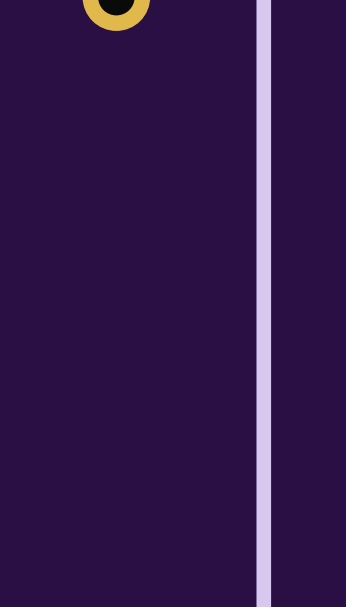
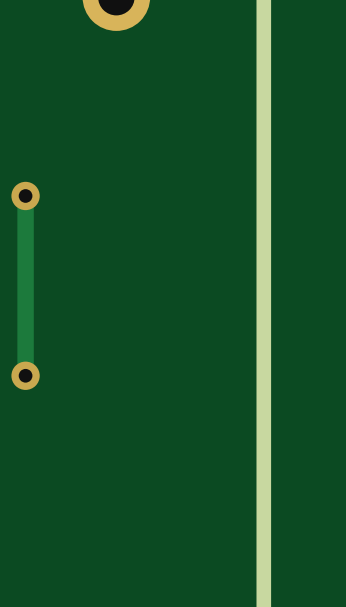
track: none -> (25, 195) (25, 375)
via: none -> (25, 195)
via: none -> (25, 375)

